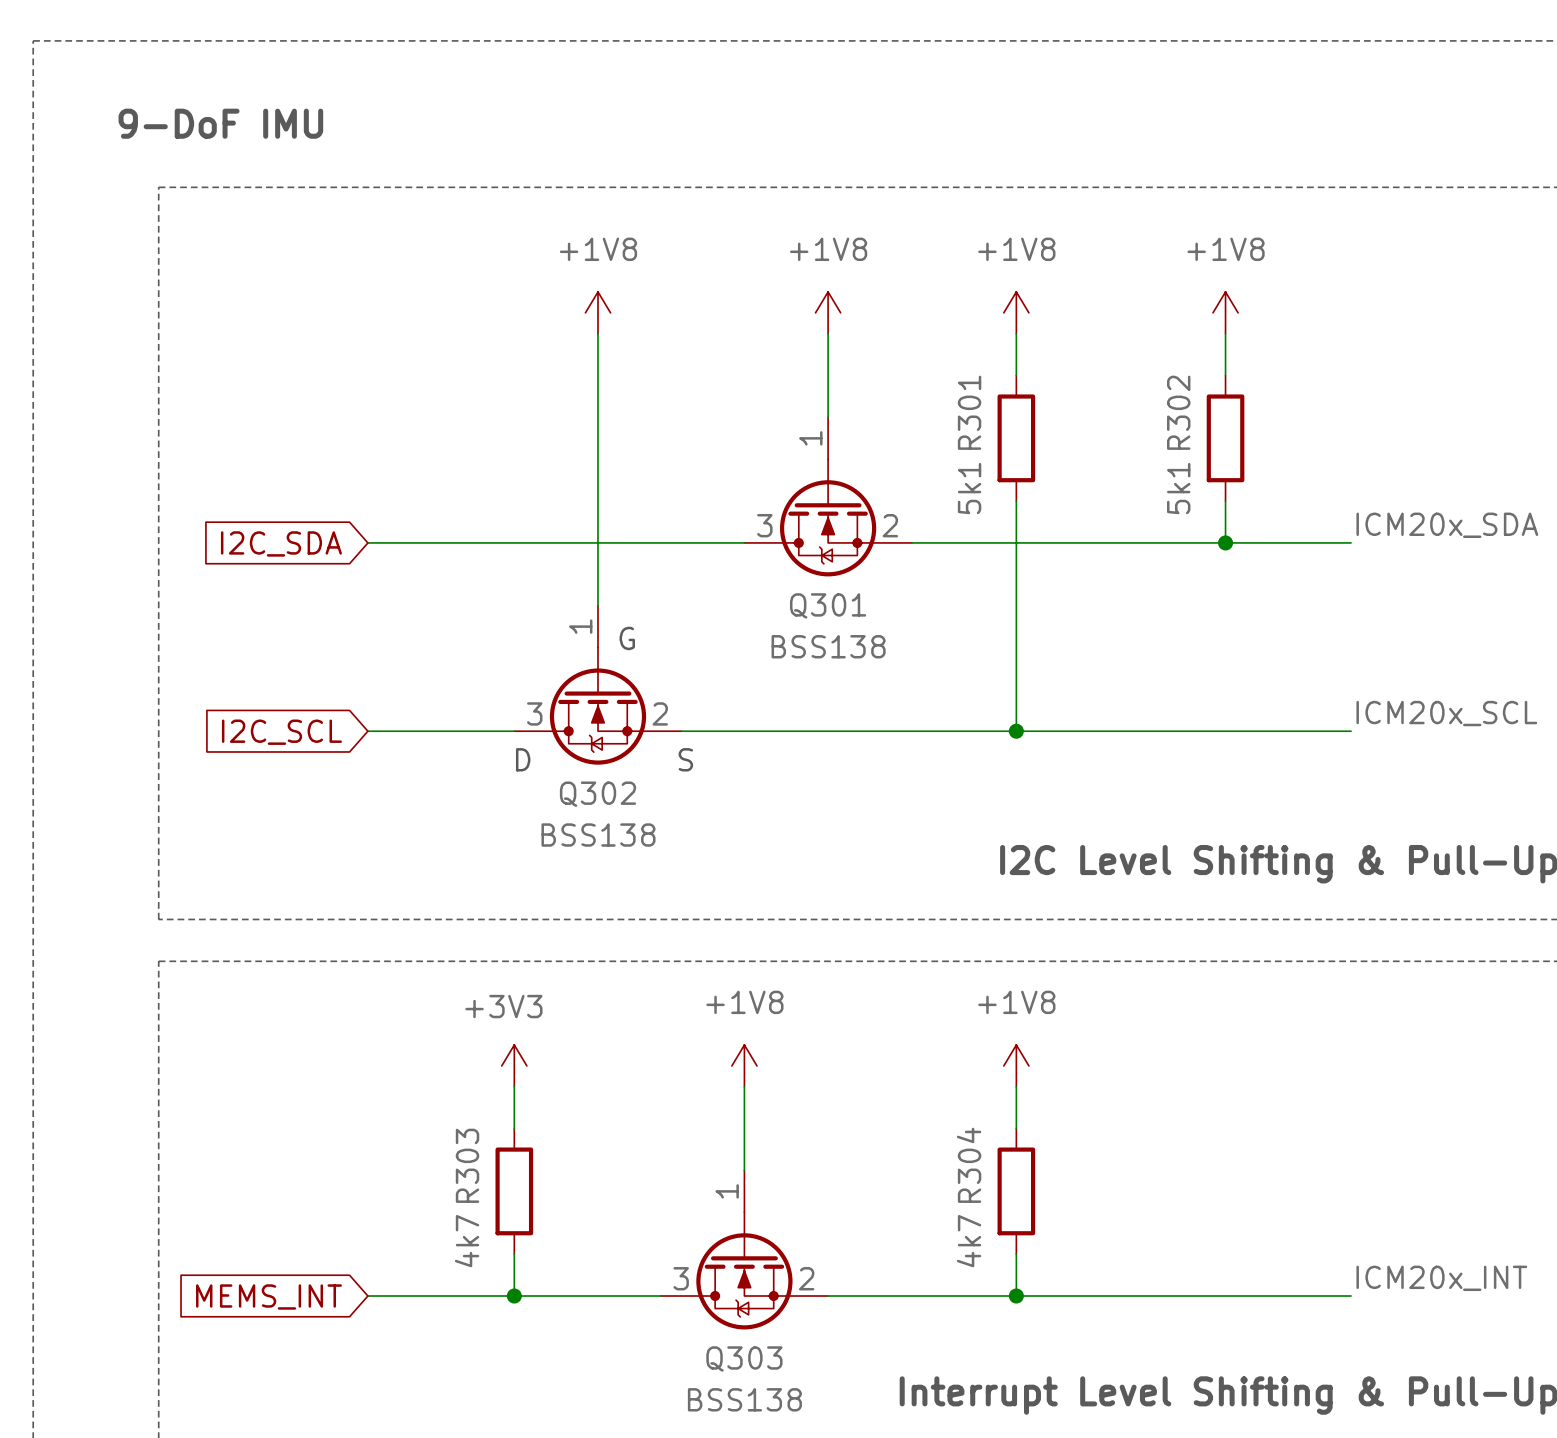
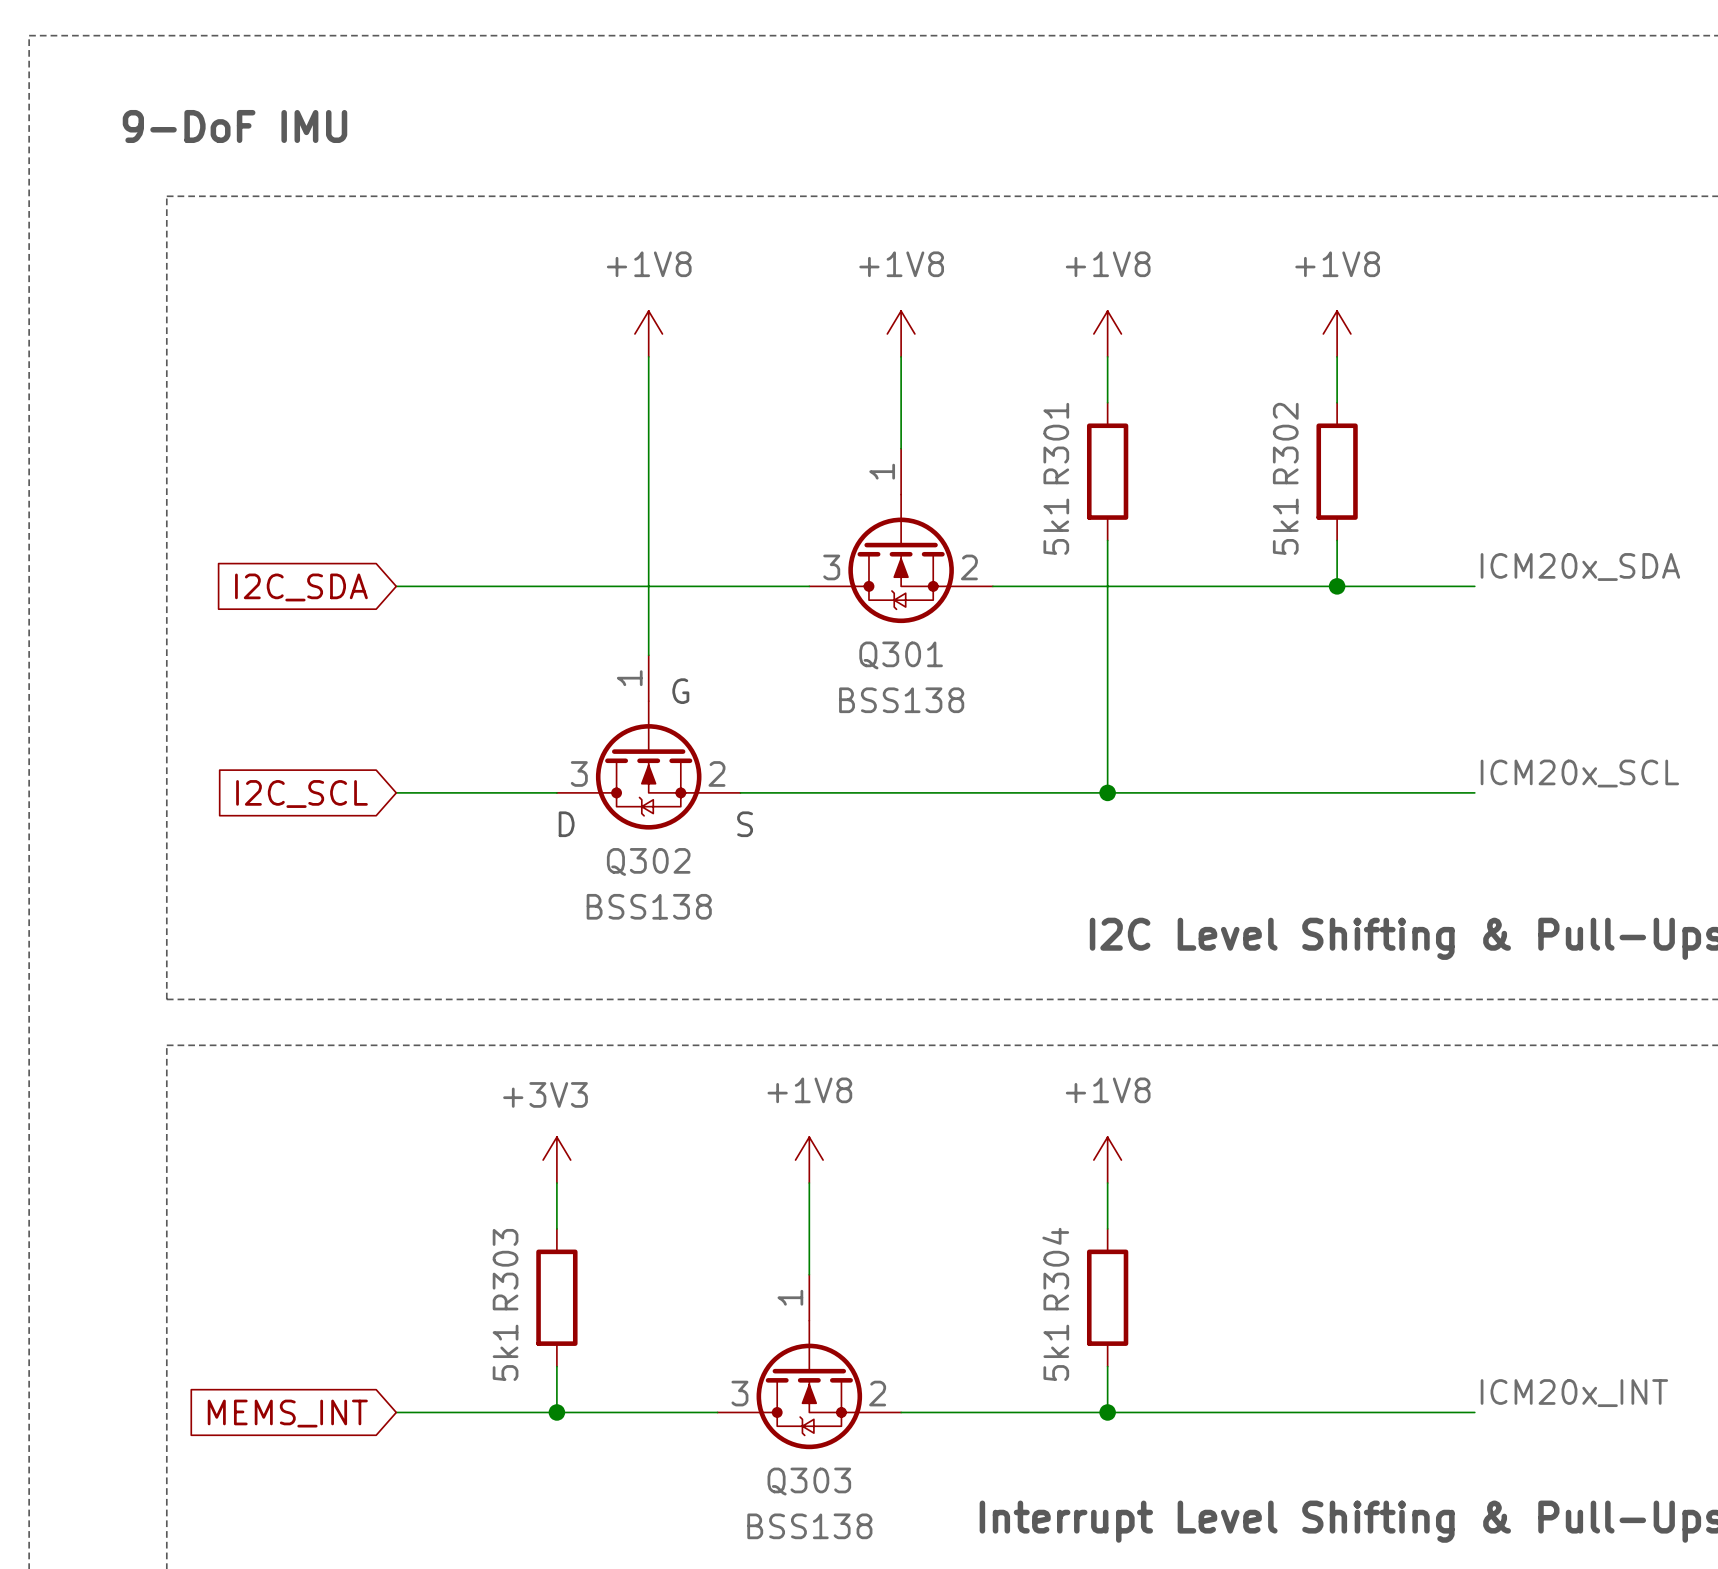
R303 value: 4k7 (467, 1241) -> 5k1 (505, 1352)
R304 value: 4k7 (969, 1241) -> 5k1 (1056, 1352)

